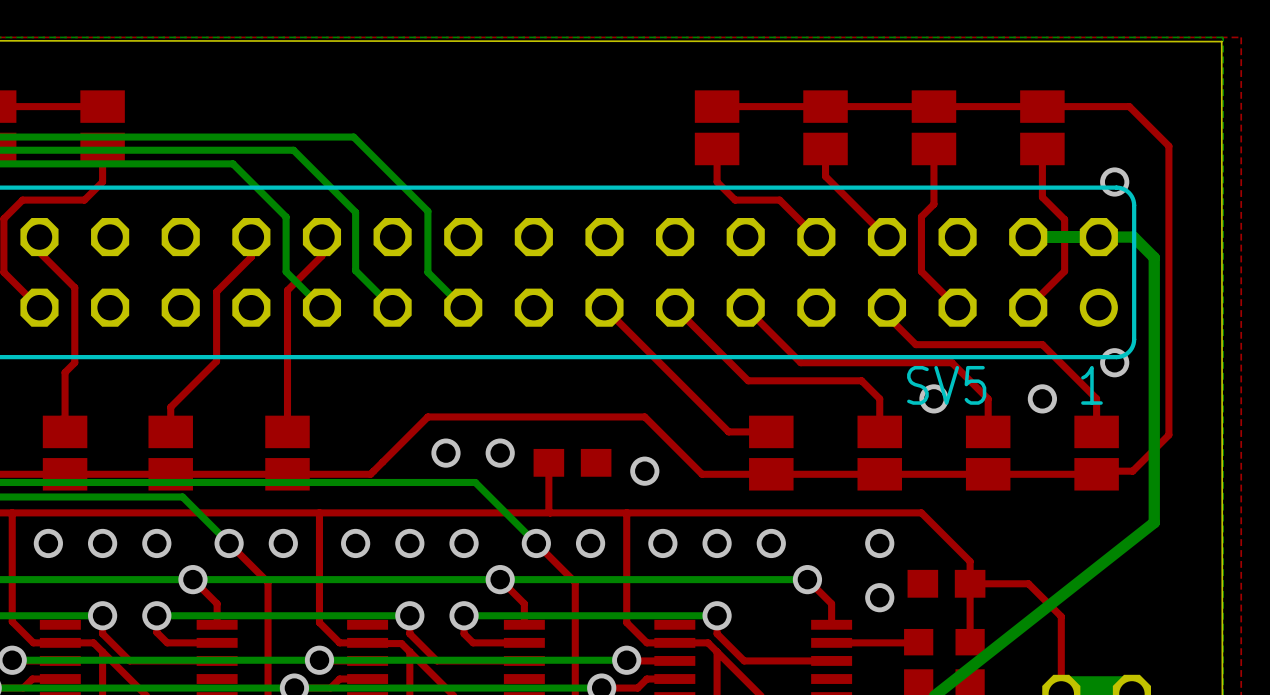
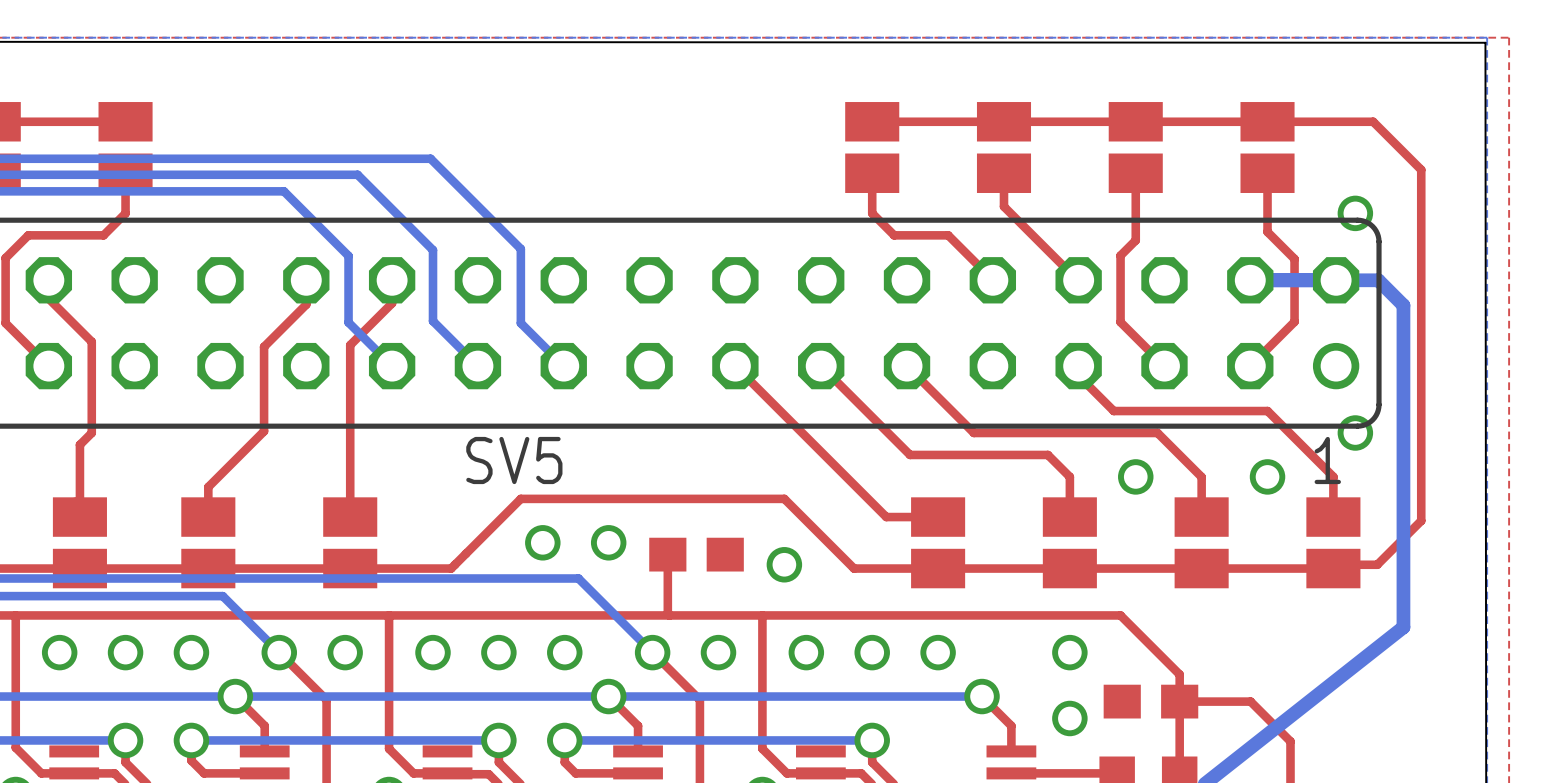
SV5 name position: SV5 (946, 385) -> SV5 (514, 460)

